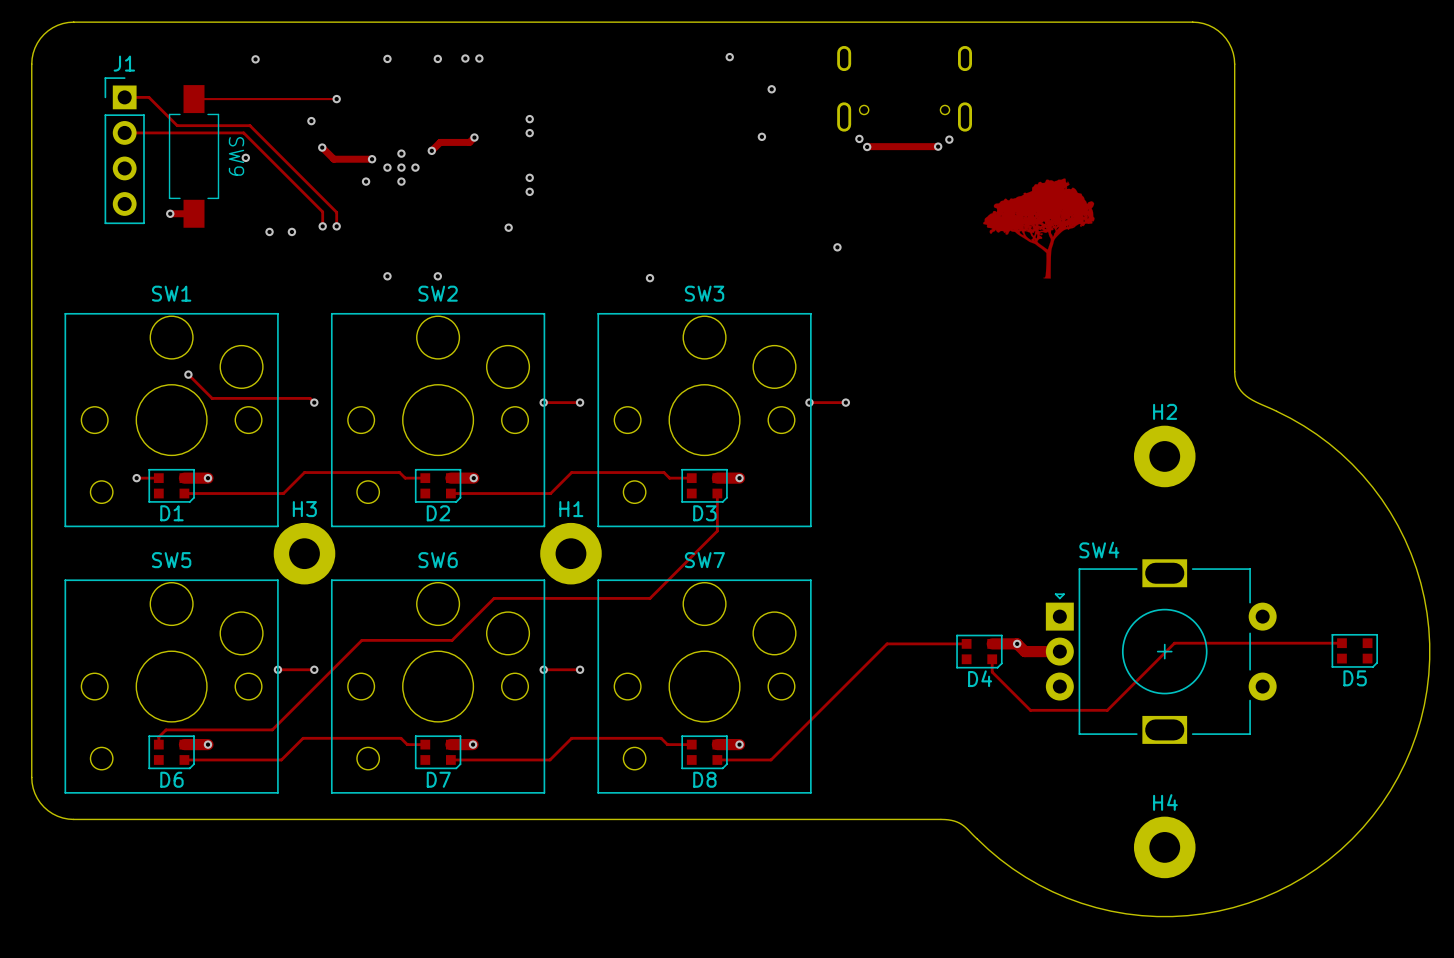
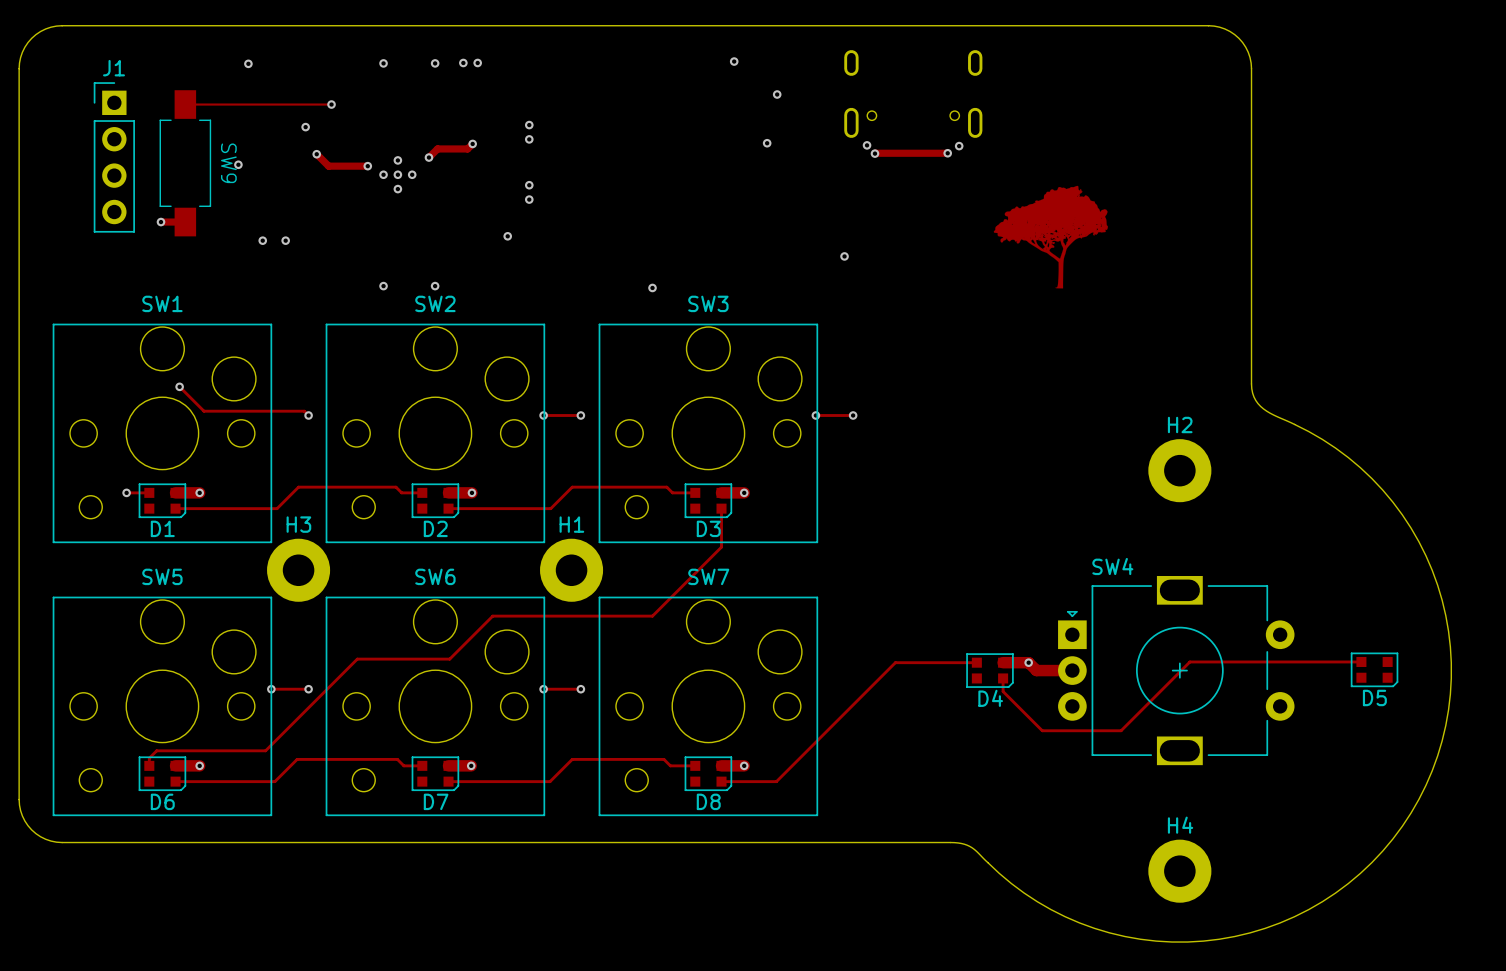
track: (124, 97) (148, 97) (177, 125) (249, 125) (336, 212) (336, 226) -> none
track: (124, 132) (243, 132) (322, 211) (322, 226) -> none
via: (366, 181) -> none
via: (322, 226) -> none
via: (336, 226) -> none

